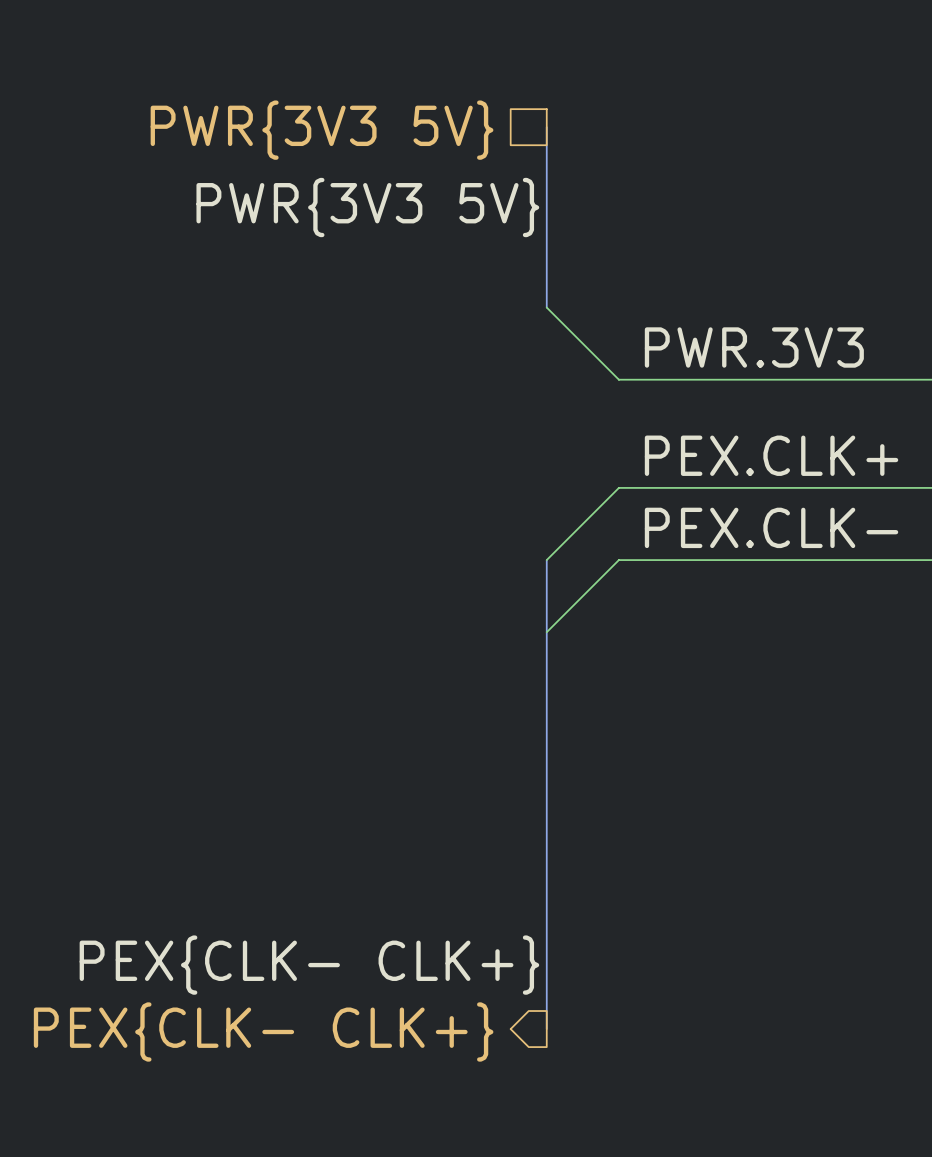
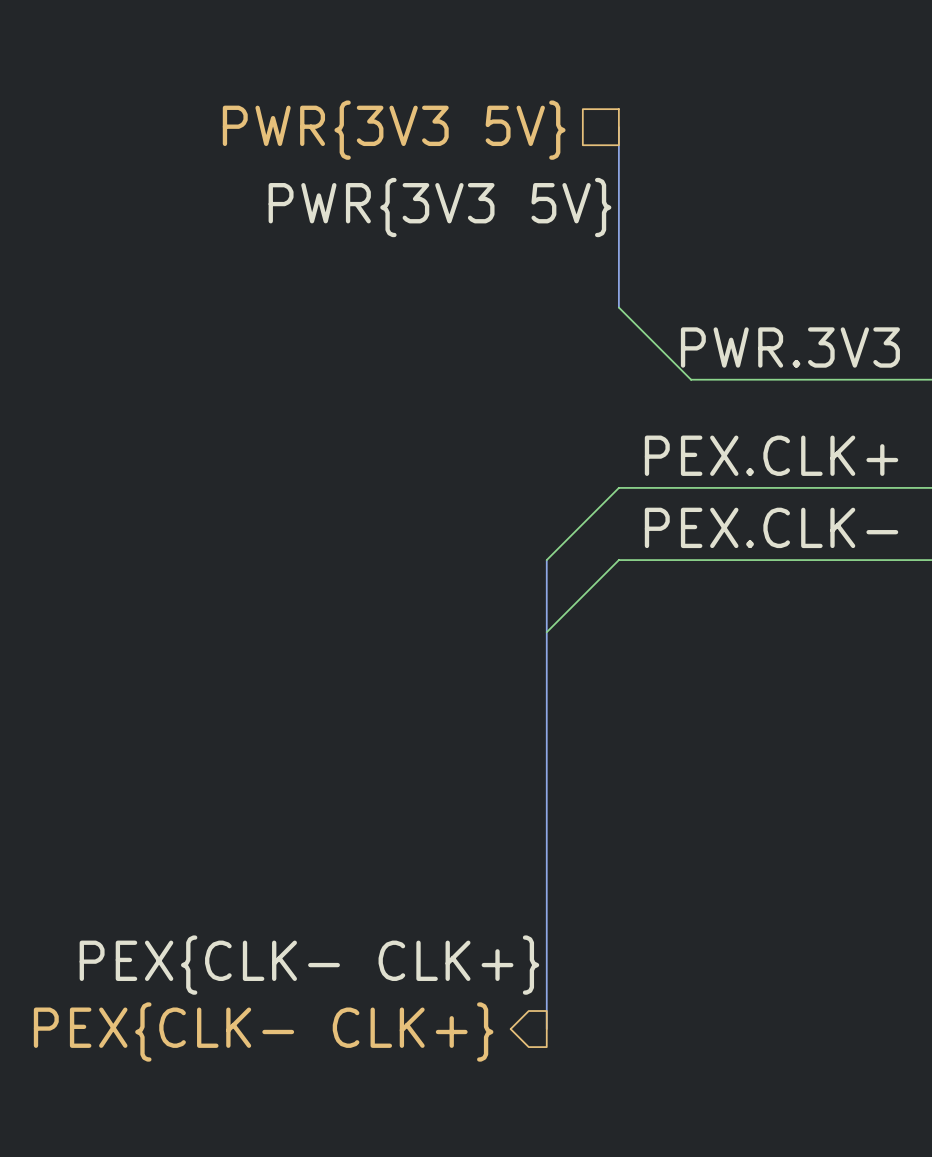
bus: (546, 127) (546, 307) -> (618, 127) (618, 307)
hierarchical label position: PWR{3V3 5V} (322, 130) -> PWR{3V3 5V} (394, 130)
label position: PWR{3V3 5V} (367, 207) -> PWR{3V3 5V} (439, 207)
wire: (546, 307) (618, 379) (691, 379) -> (618, 307) (691, 379)
label position: PWR.3V3 (754, 347) -> PWR.3V3 (790, 347)

